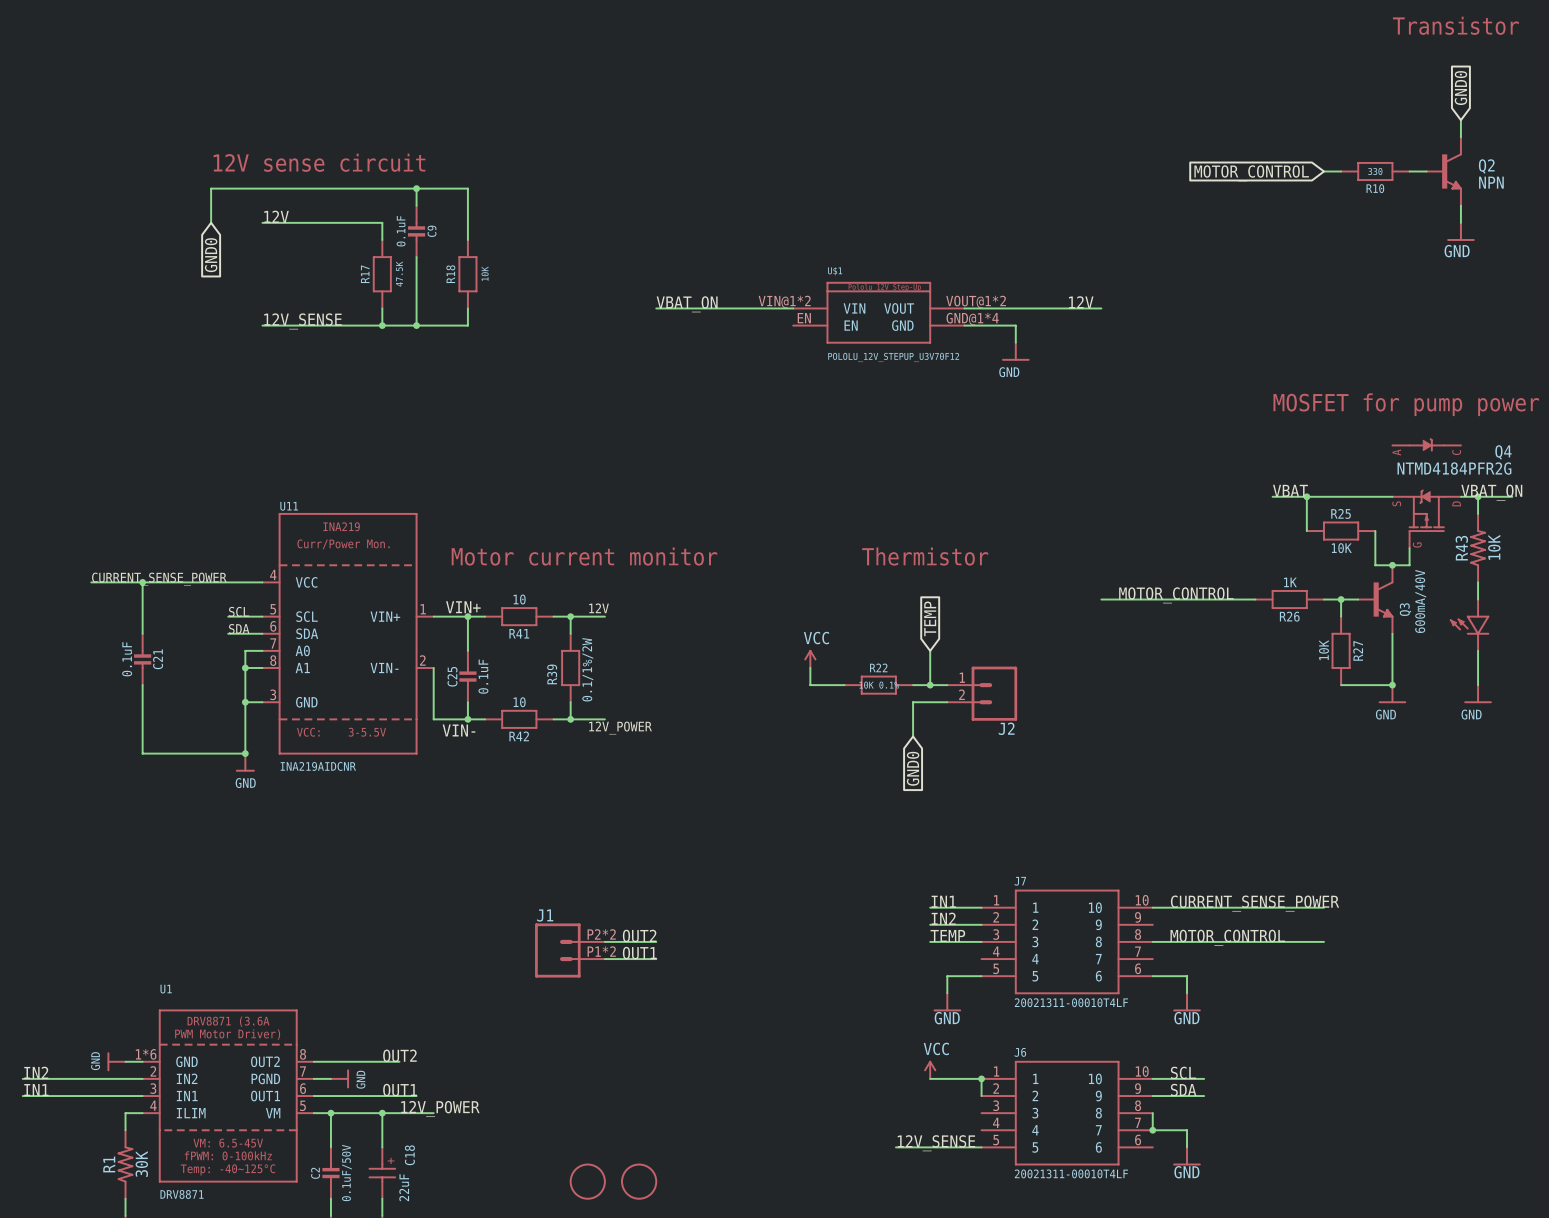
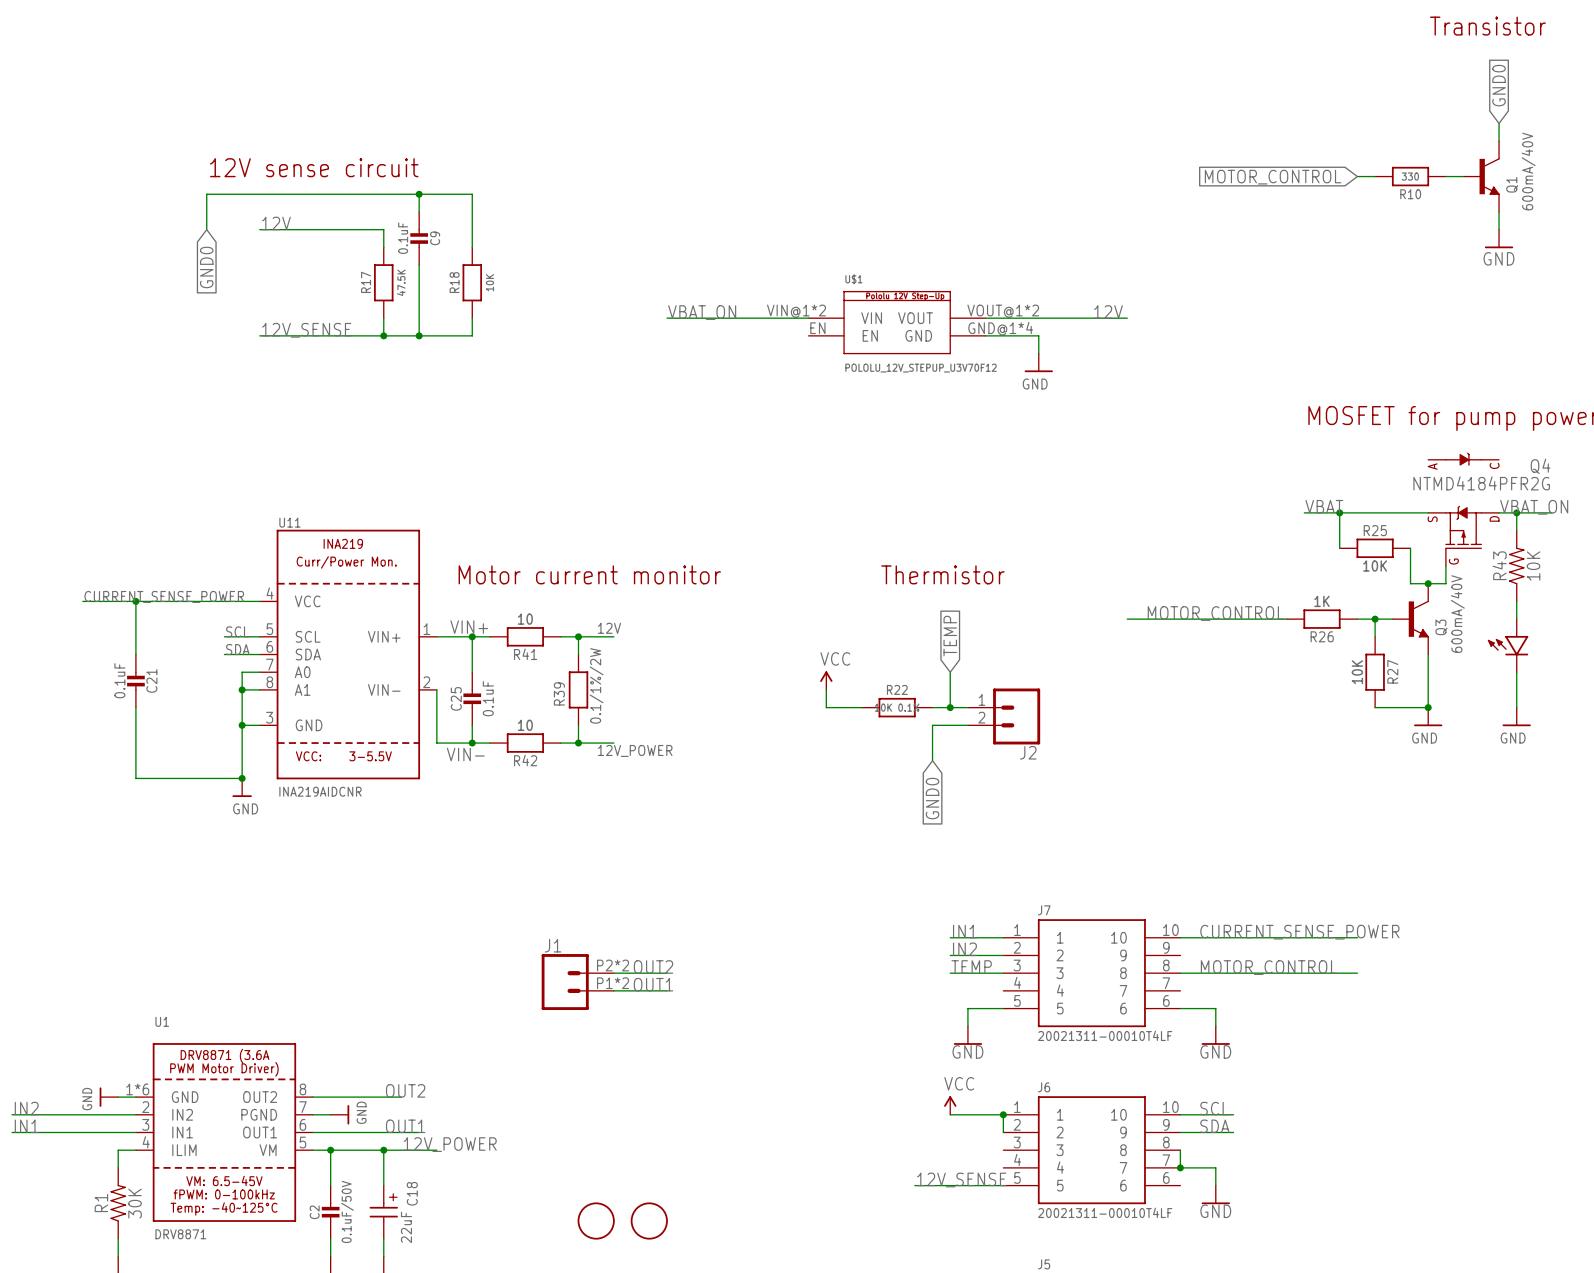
Q2 name: Q2 (1486, 166) -> Q1 (1512, 184)
Q2 value: NPN (1491, 182) -> 600mA/40V (1528, 171)

